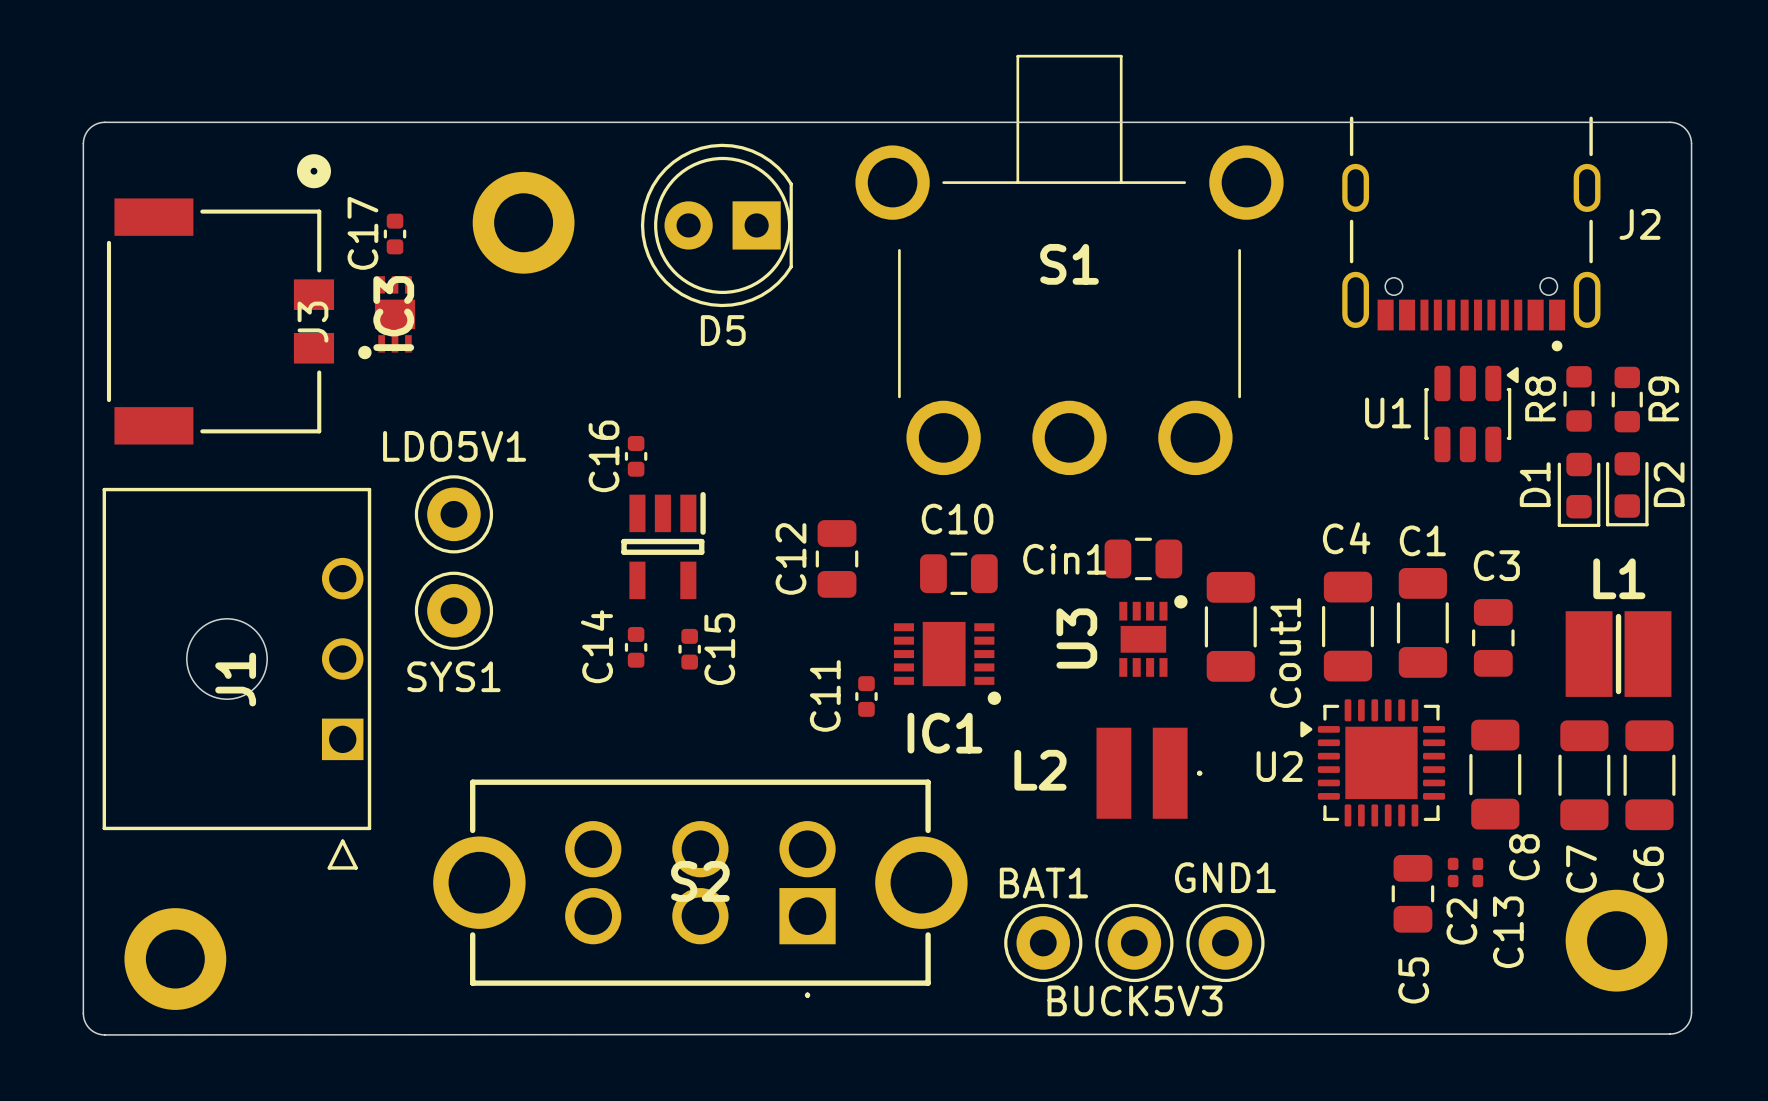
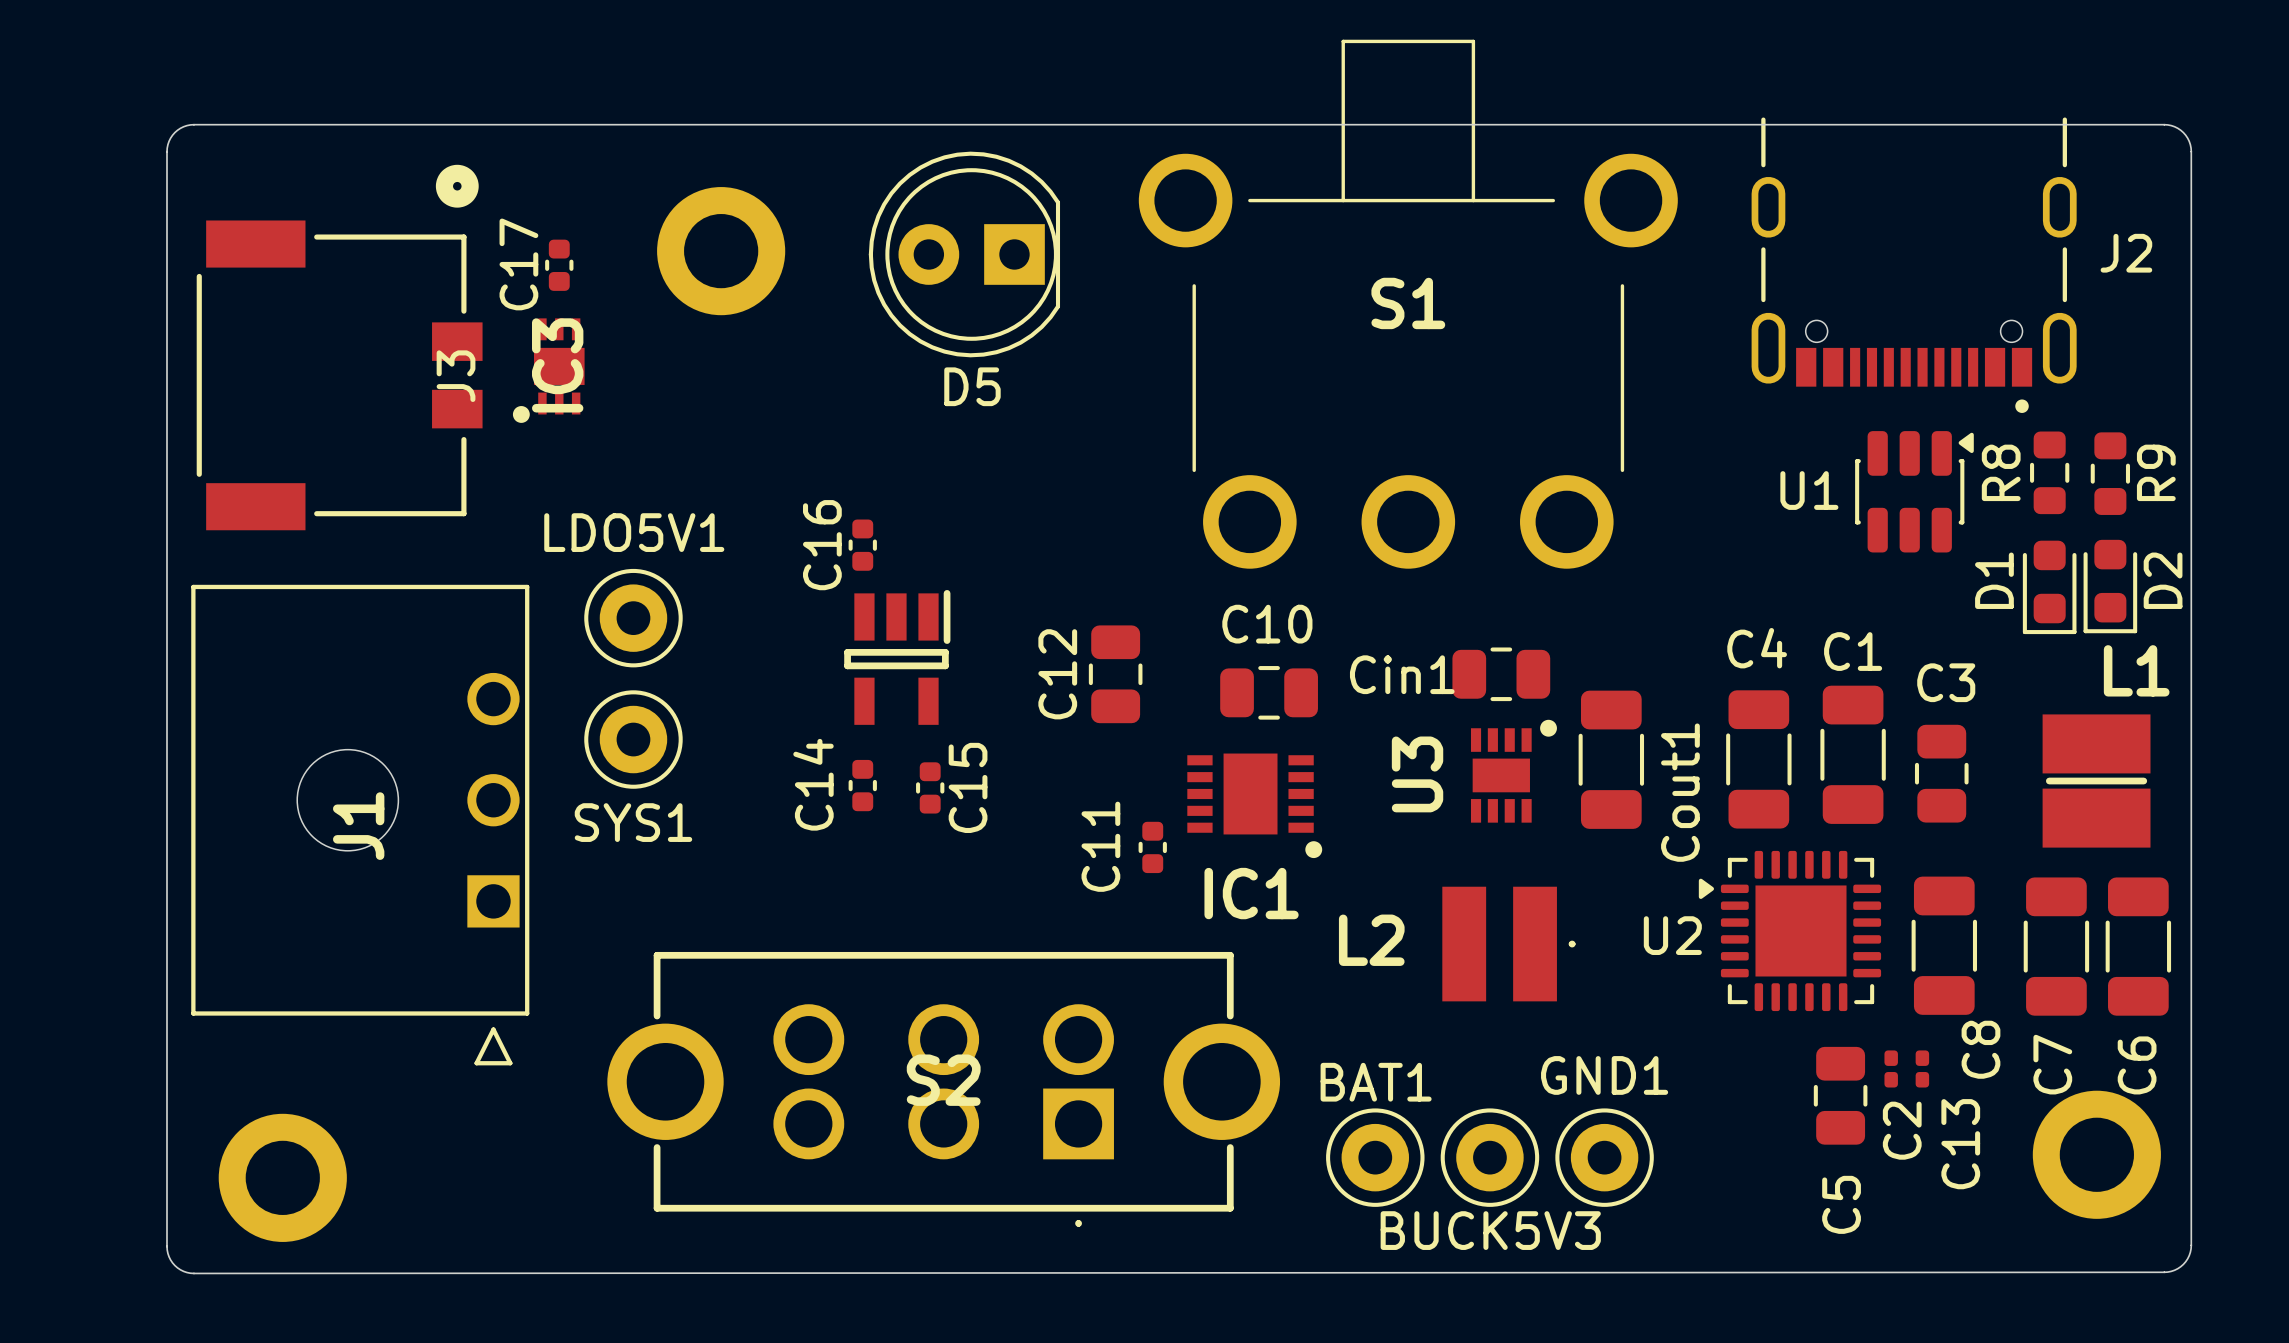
L1 rotation: 0° (1618, 654) -> 90° clockwise (2096, 781)

